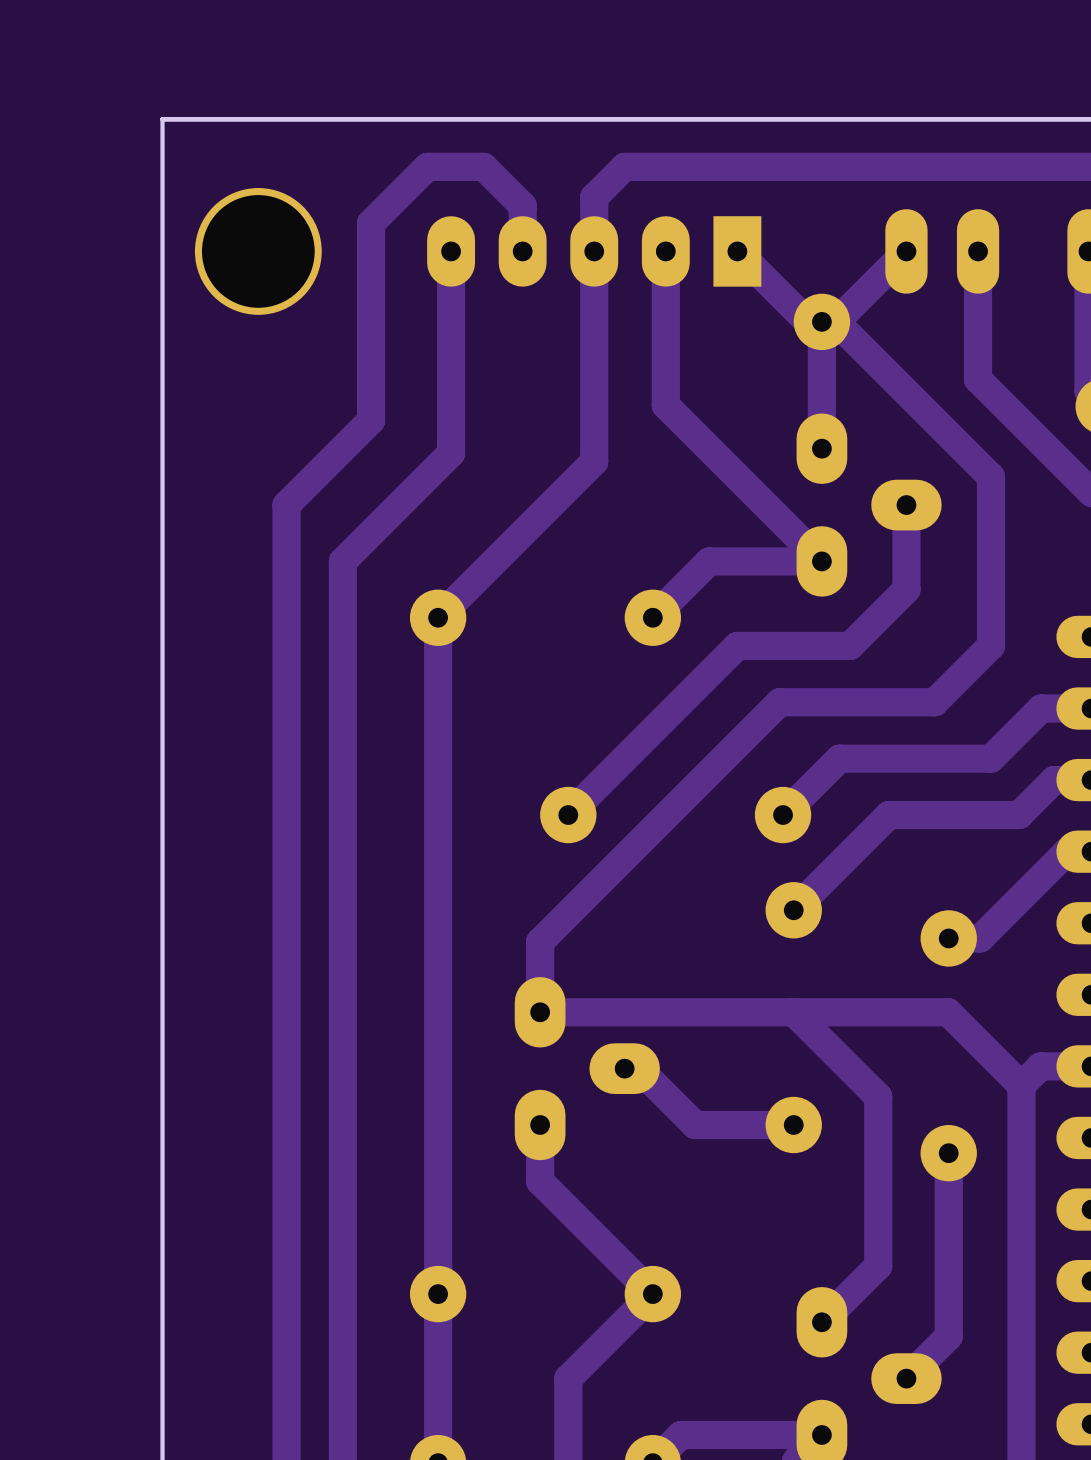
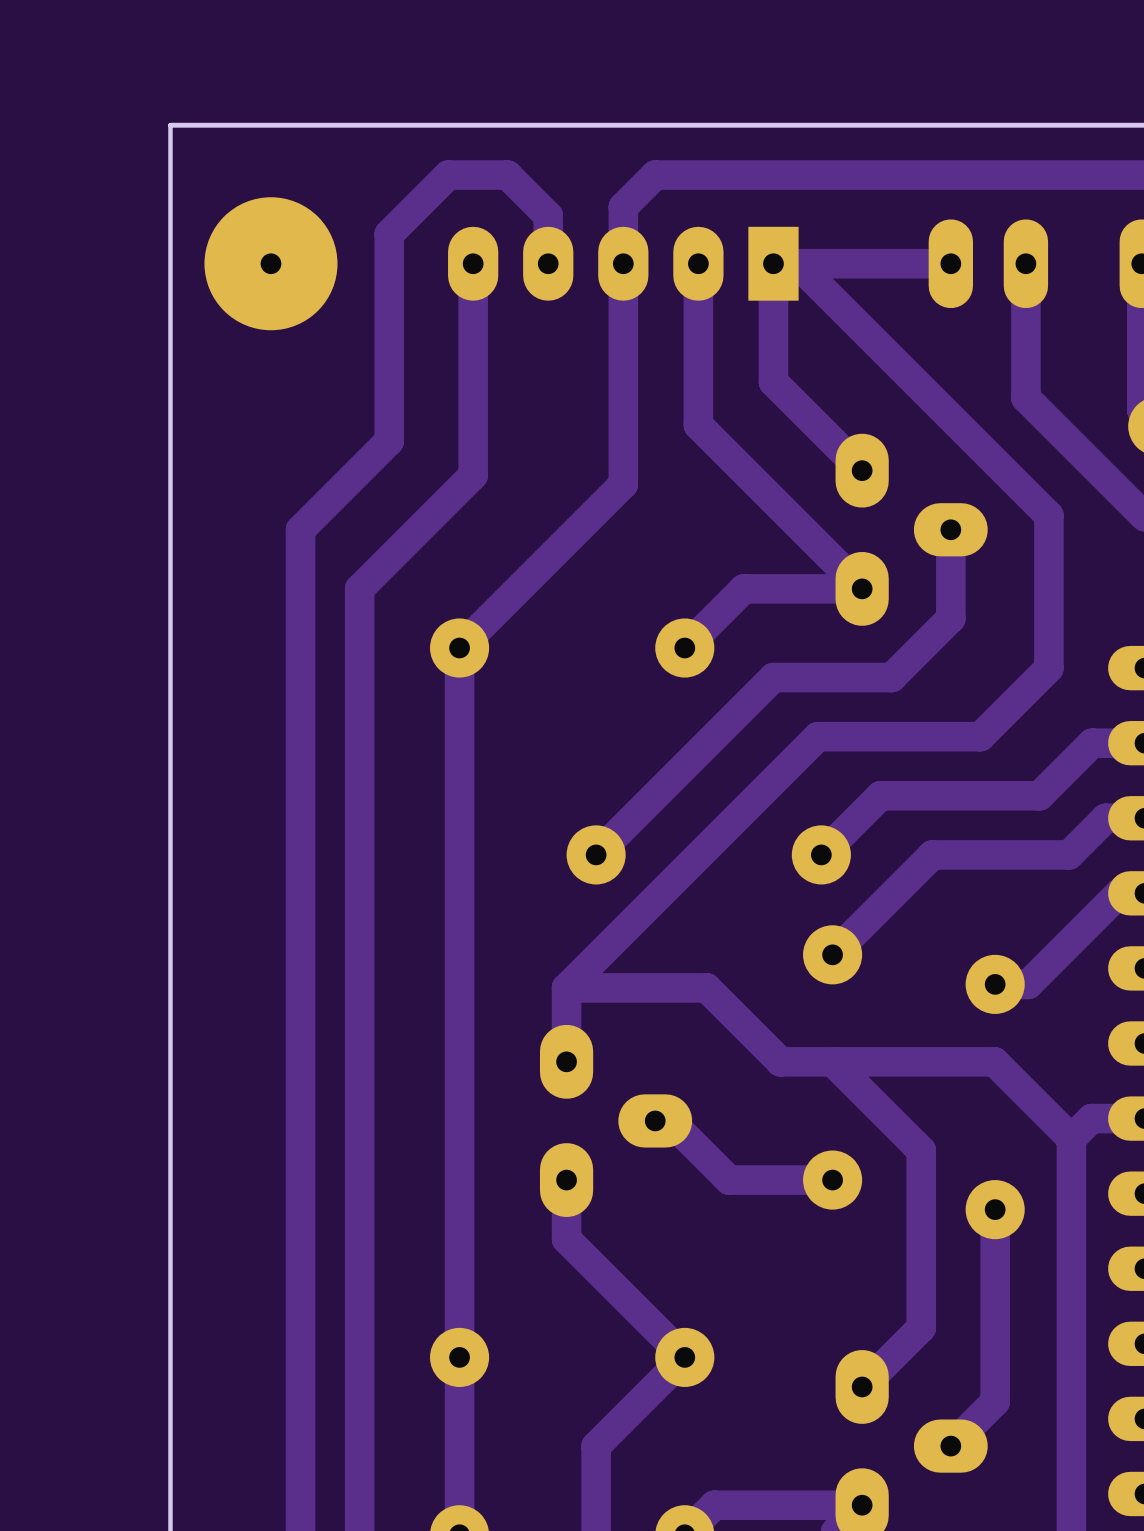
part footprint: [194, 188, 322, 315] -> [204, 197, 338, 331]
track: (906, 251) (821, 335) (737, 251) -> (950, 263) (773, 263) (773, 381) (862, 470)
part: (821, 321) -> none
track: (821, 448) (821, 321) (836, 321) (991, 476) (991, 645) -> (797, 263) (1048, 515) (1048, 668) (1039, 677)
track: (744, 1012) (540, 1012) -> (780, 1061) (706, 987) (566, 987)

